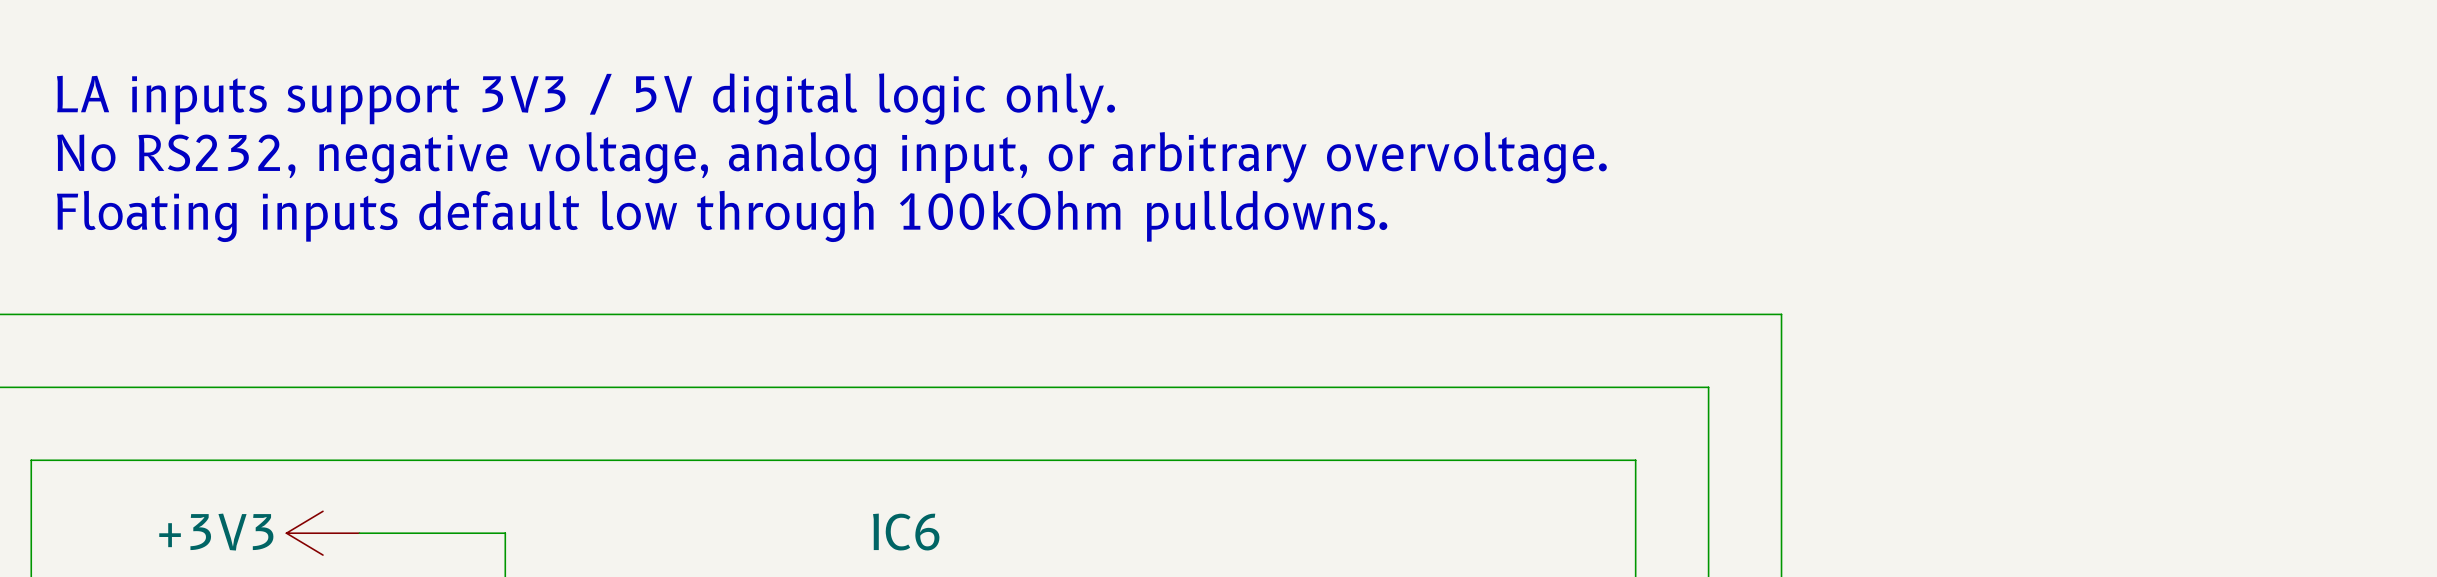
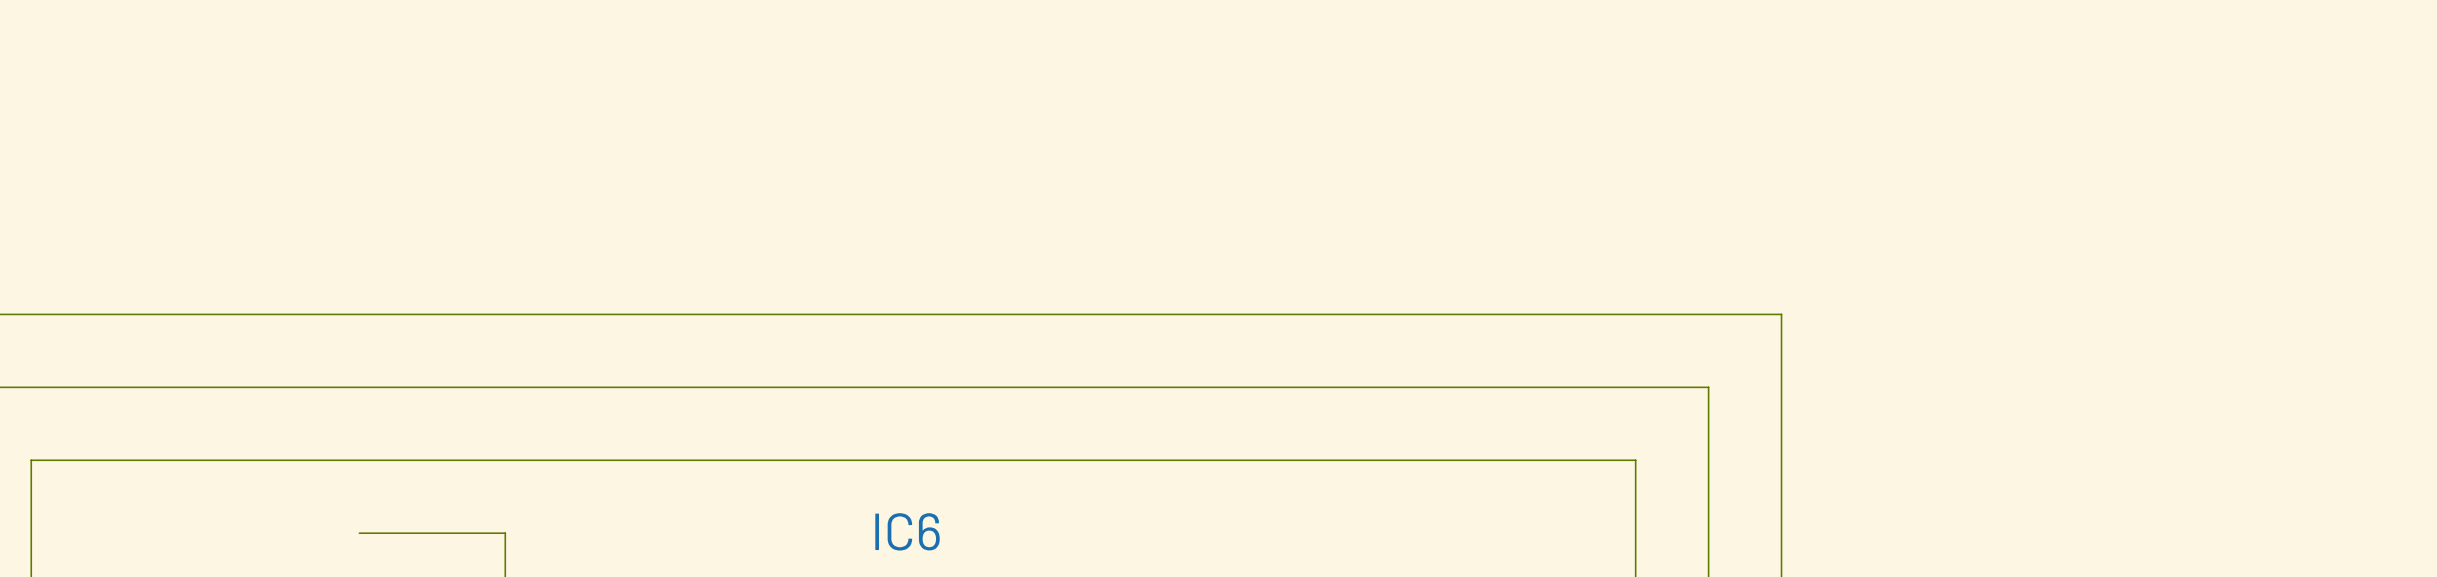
text: LA inputs support 3V3 / 5V digital logic only. (586, 99) -> none
text: No RS232, negative voltage, analog input, or arbitrary overvoltage. (832, 157) -> none
text: Floating inputs default low through 100kOhm pulldowns. (722, 216) -> none
power symbol: +3V3 (322, 533) -> none

